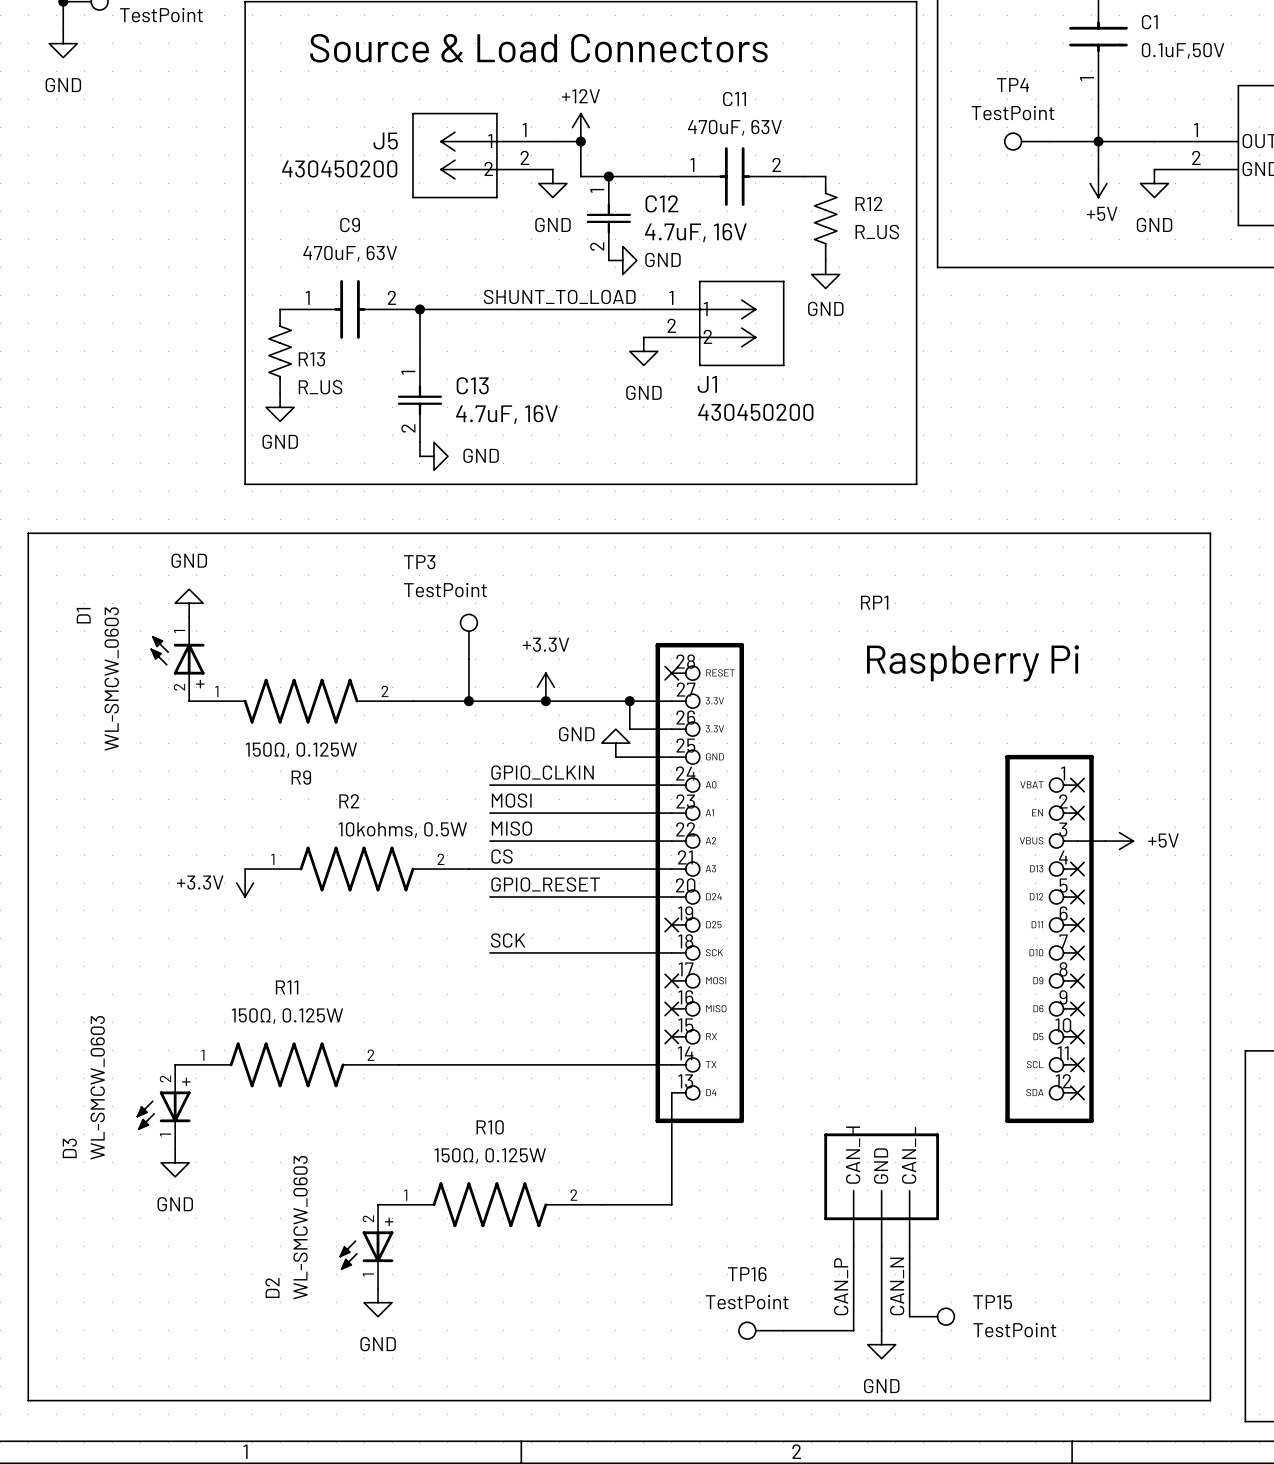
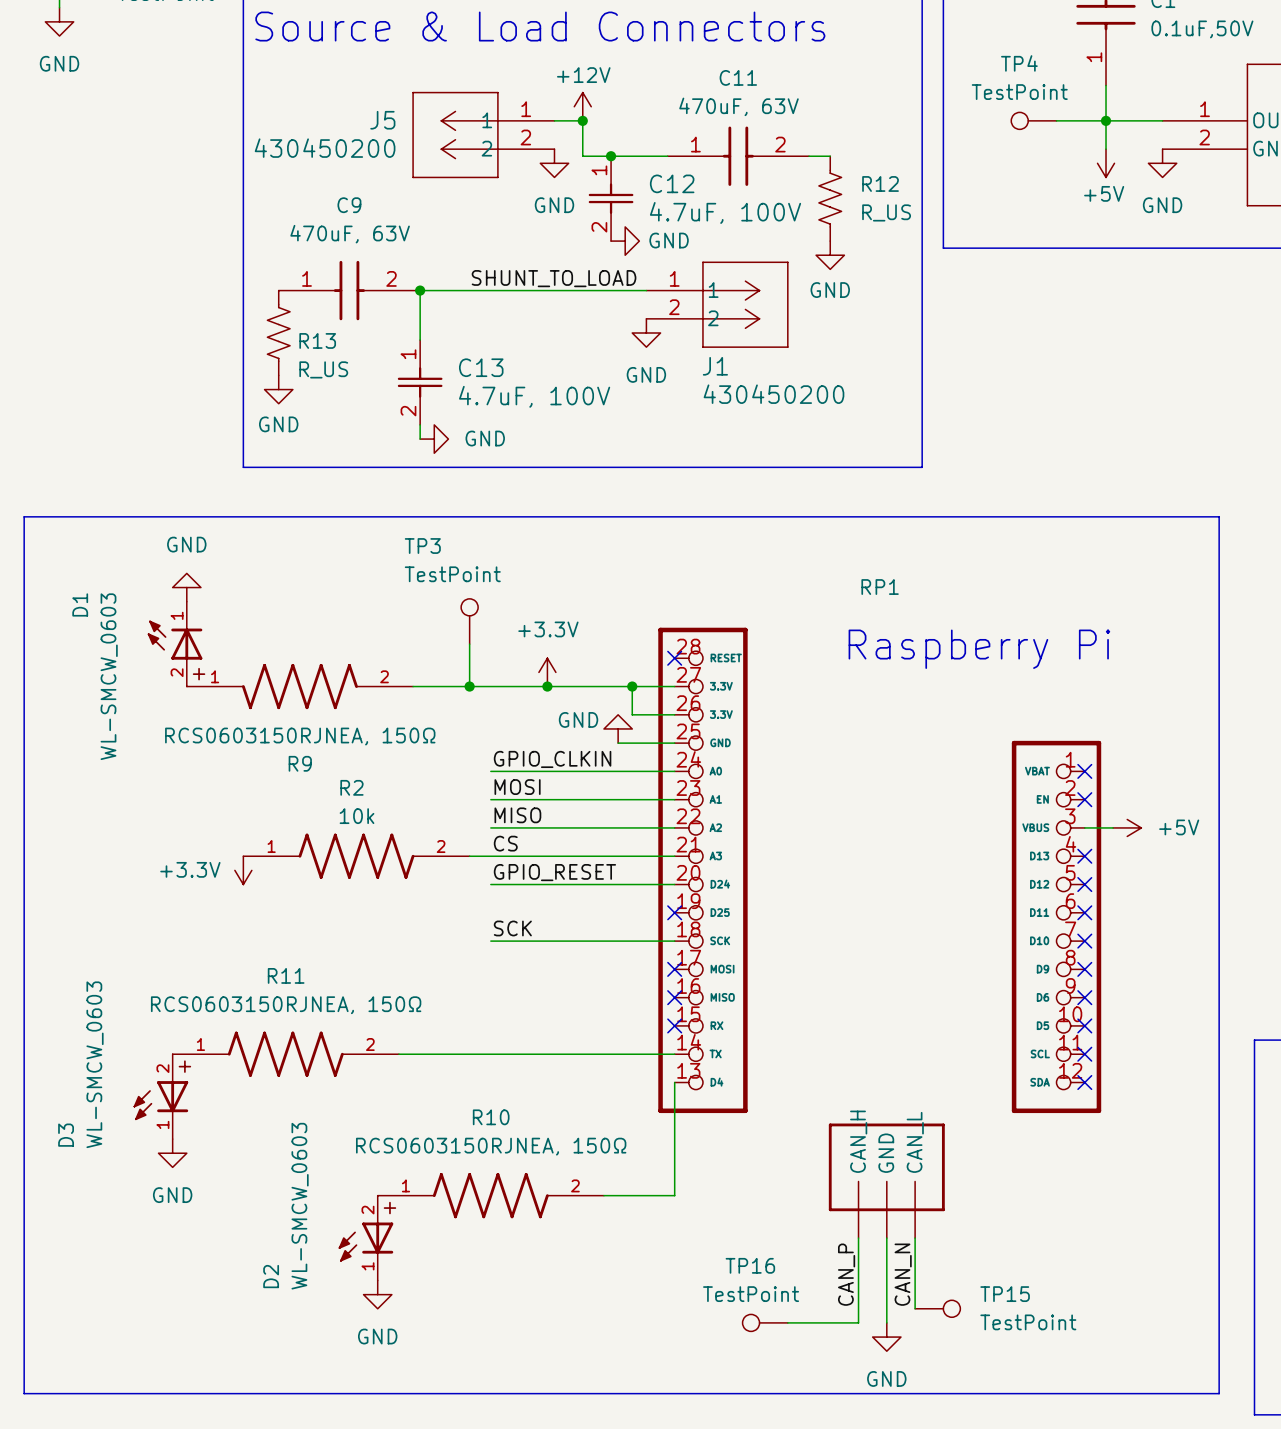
C12 value: 4.7uF, 16V (695, 232) -> 4.7uF, 100V (725, 212)
C13 value: 4.7uF, 16V (506, 414) -> 4.7uF, 100V (534, 396)
R9 value: 150Ω, 0.125W (301, 750) -> RCS0603150RJNEA, 150Ω (300, 736)
R2 value: 10kohms, 0.5W (402, 830) -> 10k (357, 816)
R11 value: 150Ω, 0.125W (287, 1016) -> RCS0603150RJNEA, 150Ω (286, 1005)
R10 value: 150Ω, 0.125W (490, 1155) -> RCS0603150RJNEA, 150Ω (491, 1146)

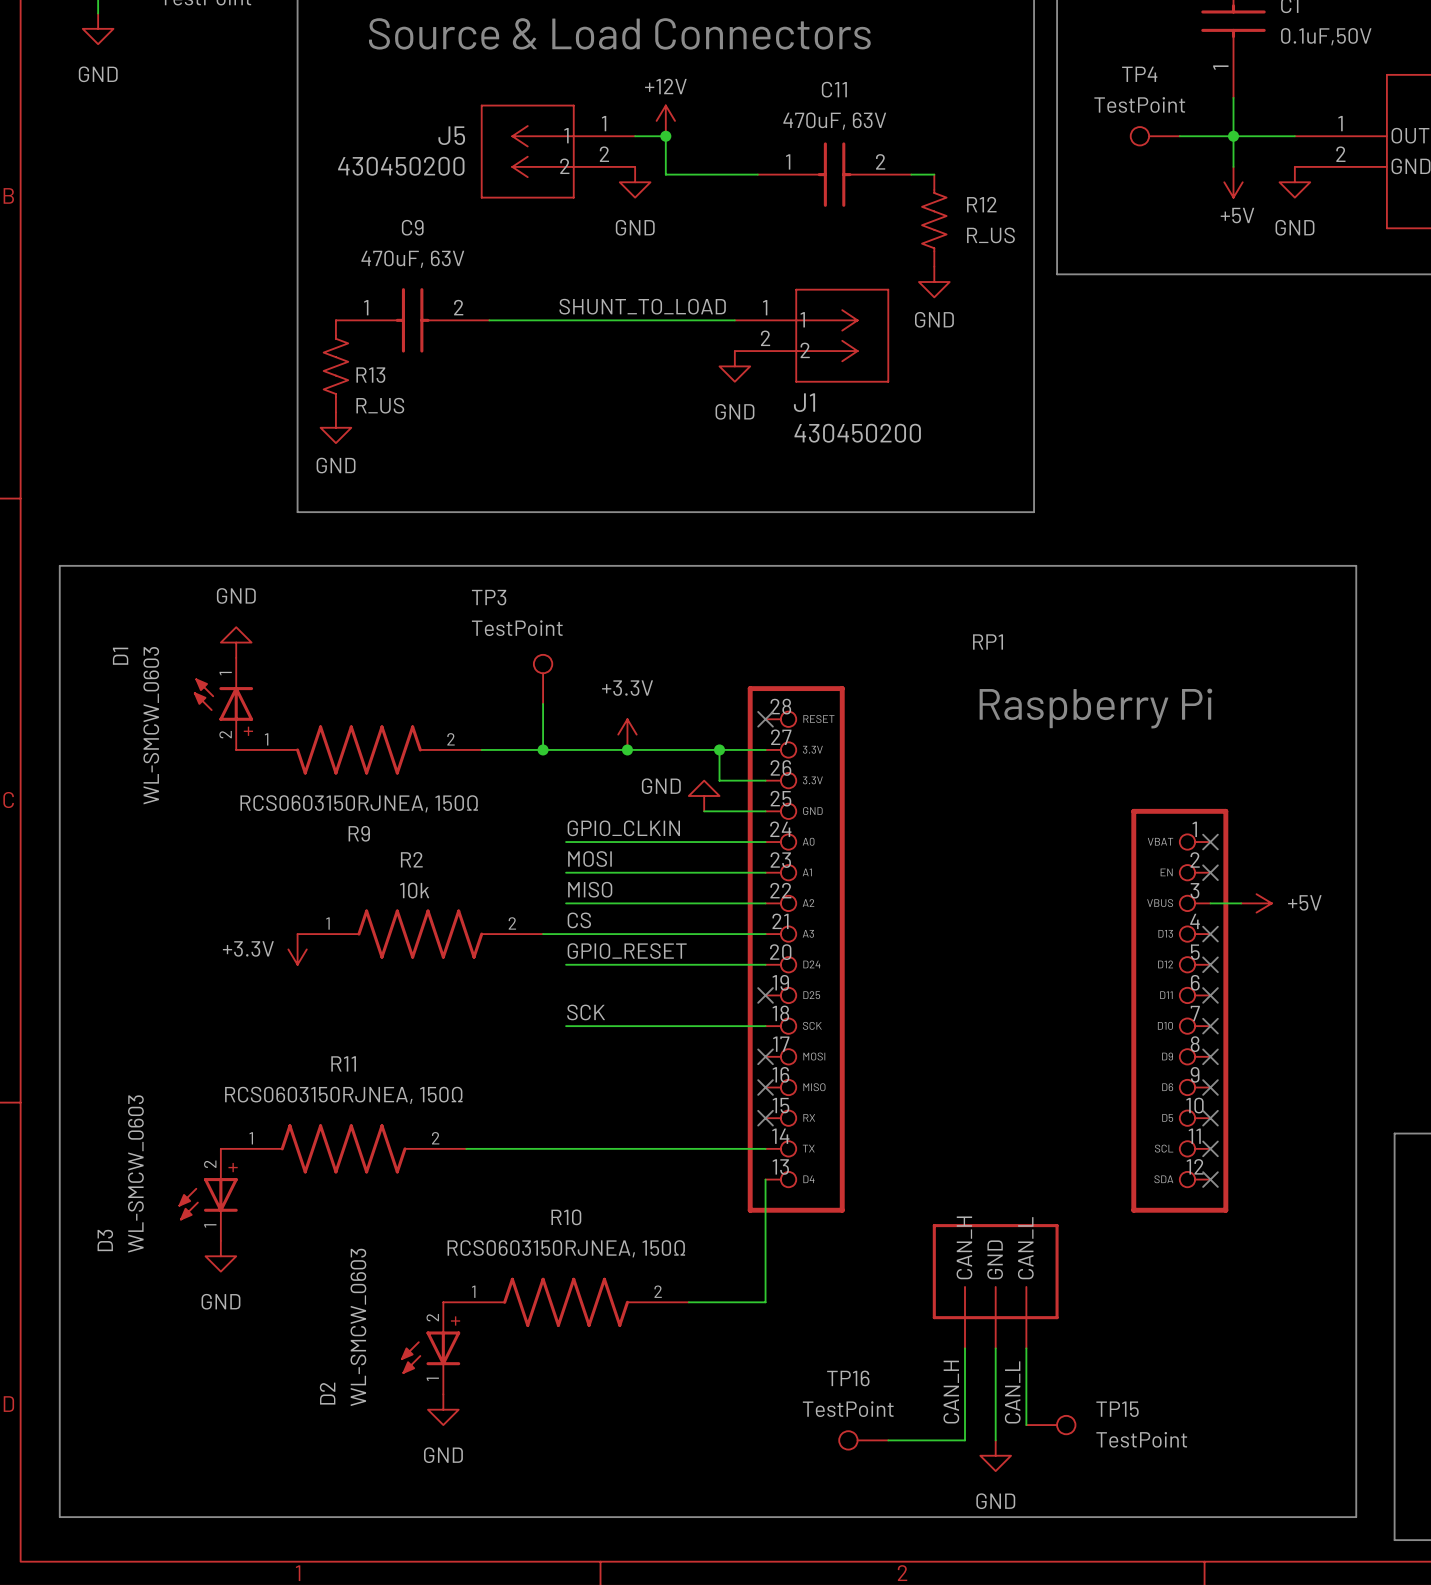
junction: (611, 156) -> none
C12: 4.7uF, 100V (611, 198) -> none
power symbol: GND (625, 241) -> none
wire: (420, 290) (420, 340) -> none
junction: (420, 290) -> none
C13: 4.7uF, 100V (420, 382) -> none
wire: (420, 424) (420, 439) -> none
power symbol: GND (434, 439) -> none
label: CAN_P (846, 1274) -> CAN_H (951, 1392)
label: CAN_N (903, 1274) -> CAN_L (1012, 1392)

